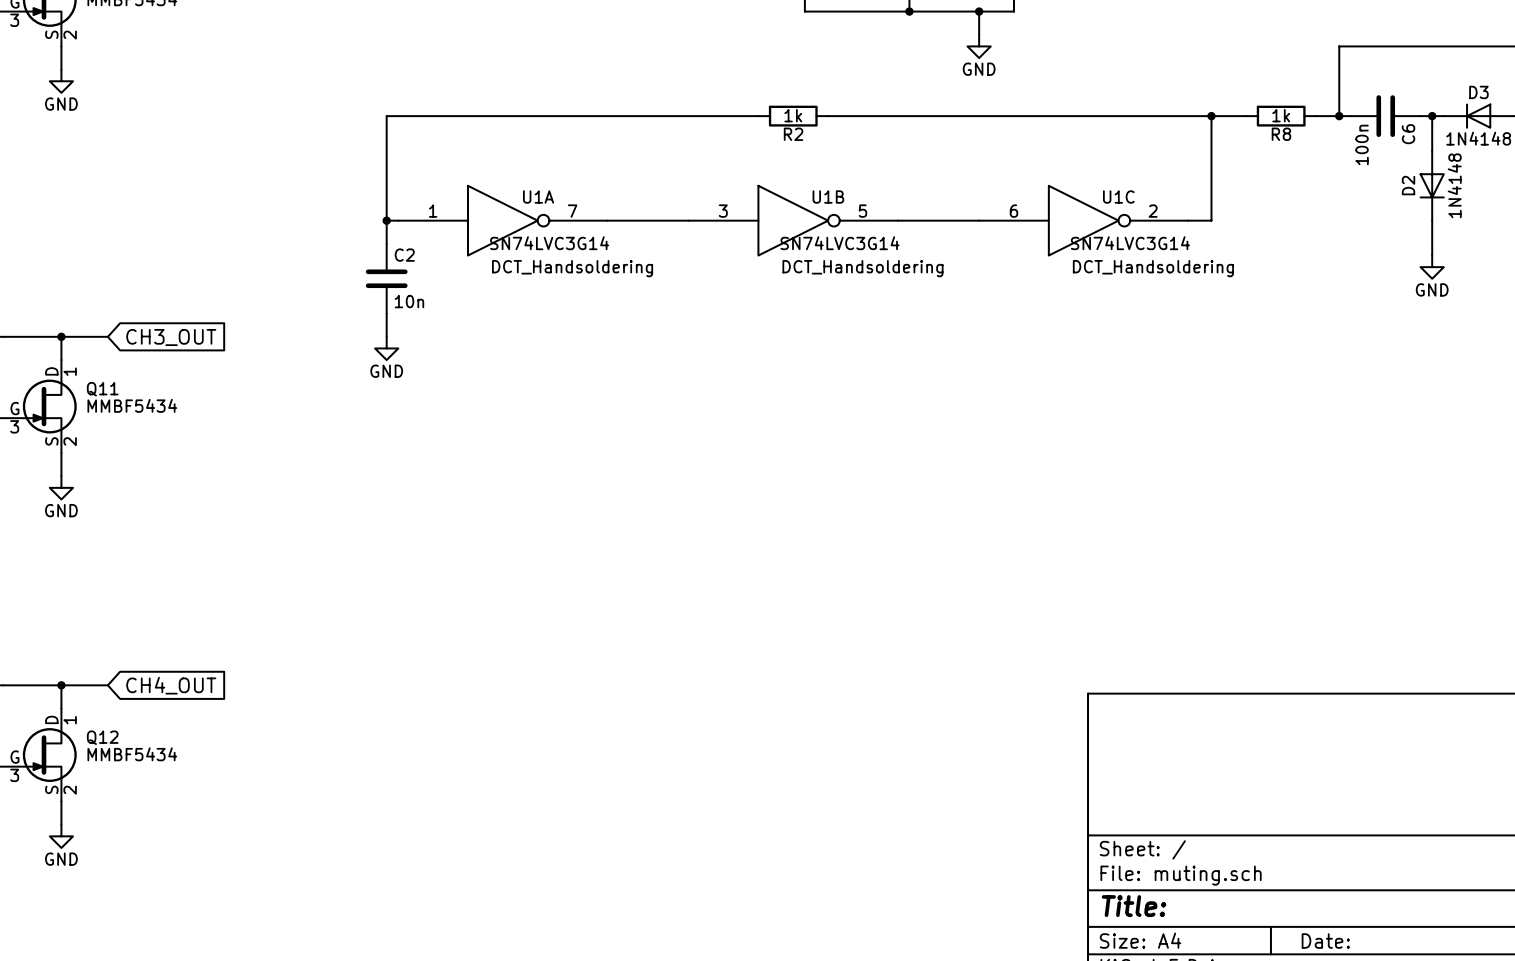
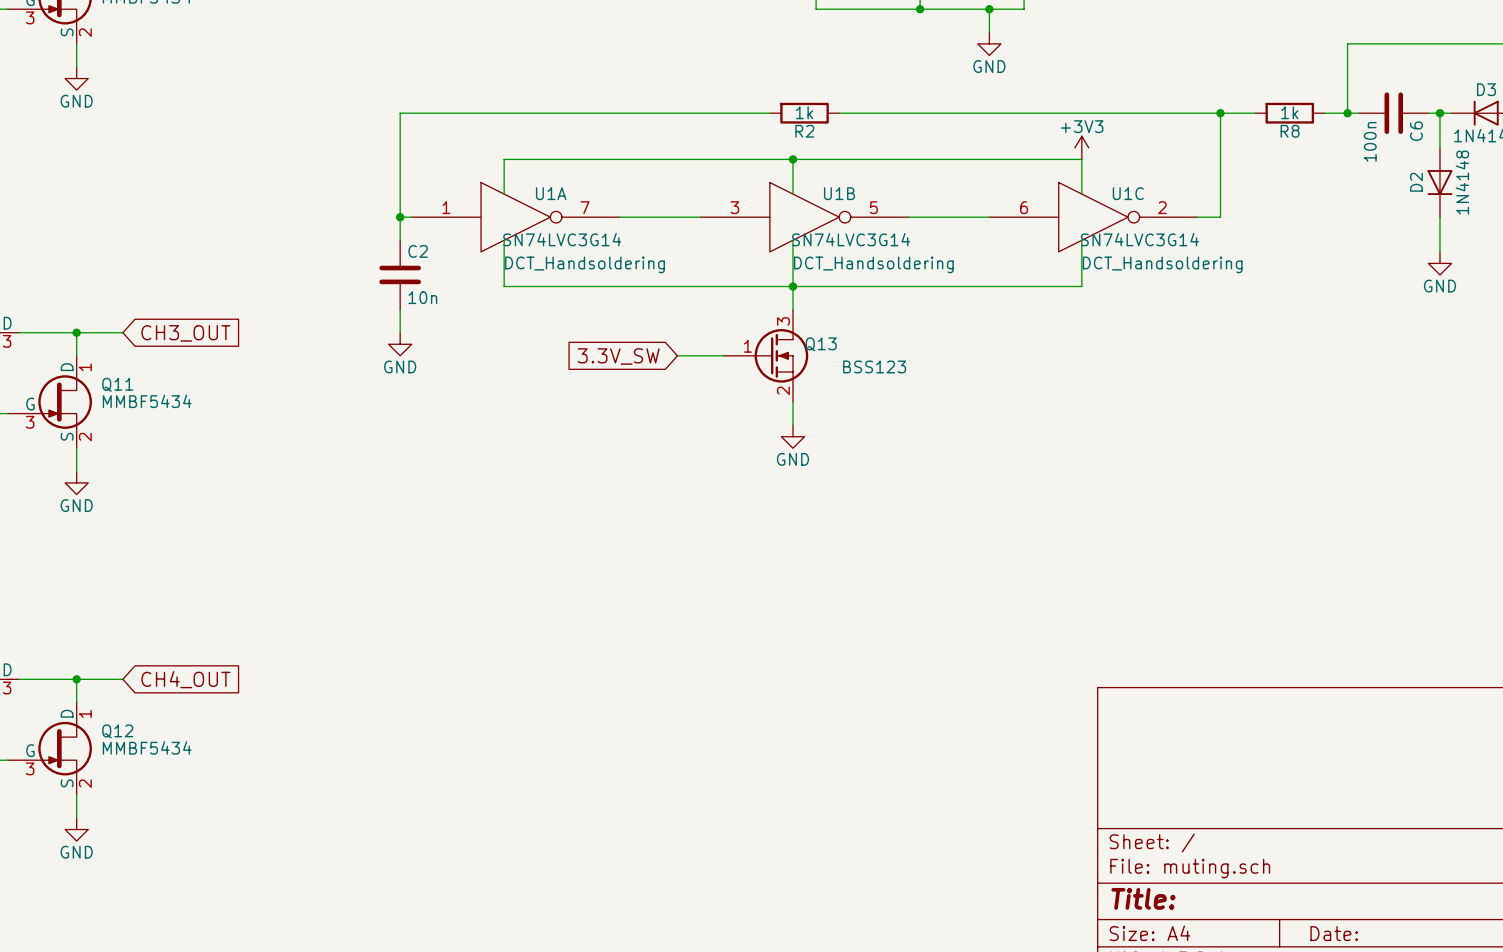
power symbol: none -> +3V3 (1081, 147)
wire: none -> (792, 159) (792, 194)
junction: none -> (792, 159)
wire: none -> (504, 194) (504, 159) (1081, 159) (1081, 194)
wire: none -> (504, 240) (504, 286) (1081, 286) (1081, 240)
wire: none -> (792, 240) (792, 309)
junction: none -> (792, 286)
global label: none -> 3.3V_SW (618, 356)
wire: none -> (677, 355) (723, 355)
Q13: none -> BSS123 (765, 355)
wire: none -> (792, 402) (792, 425)
power symbol: none -> GND (792, 436)

